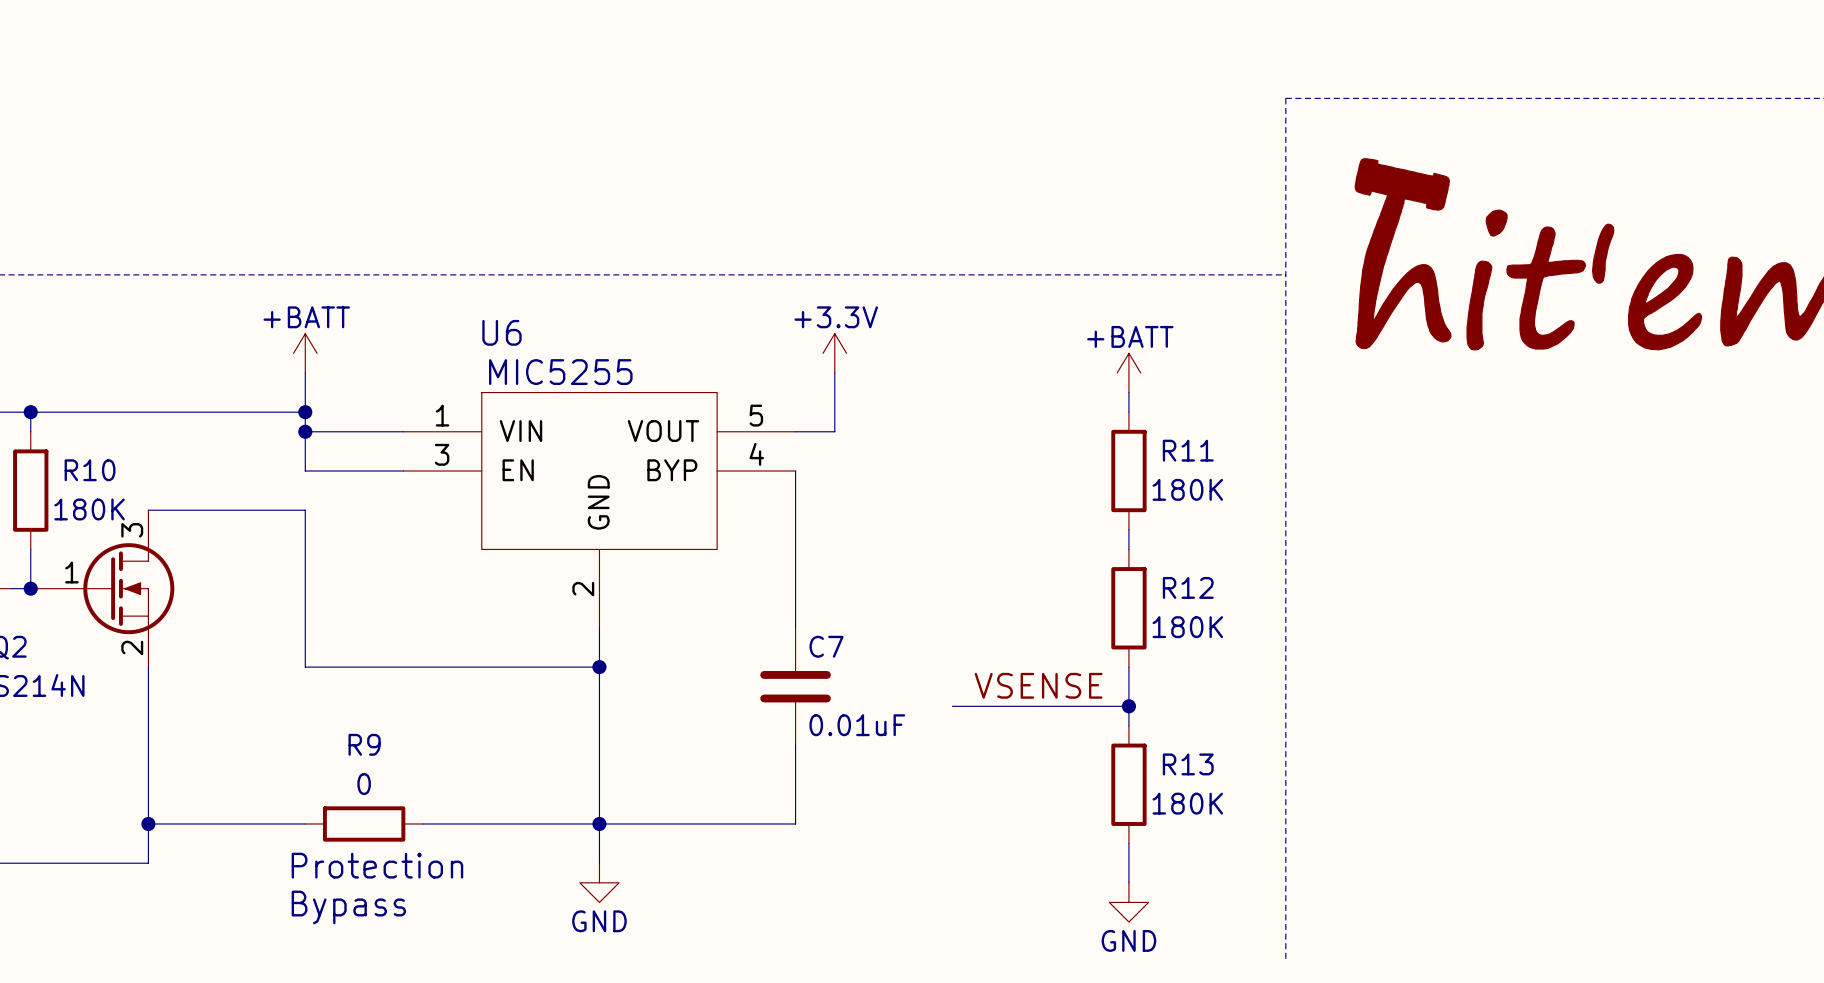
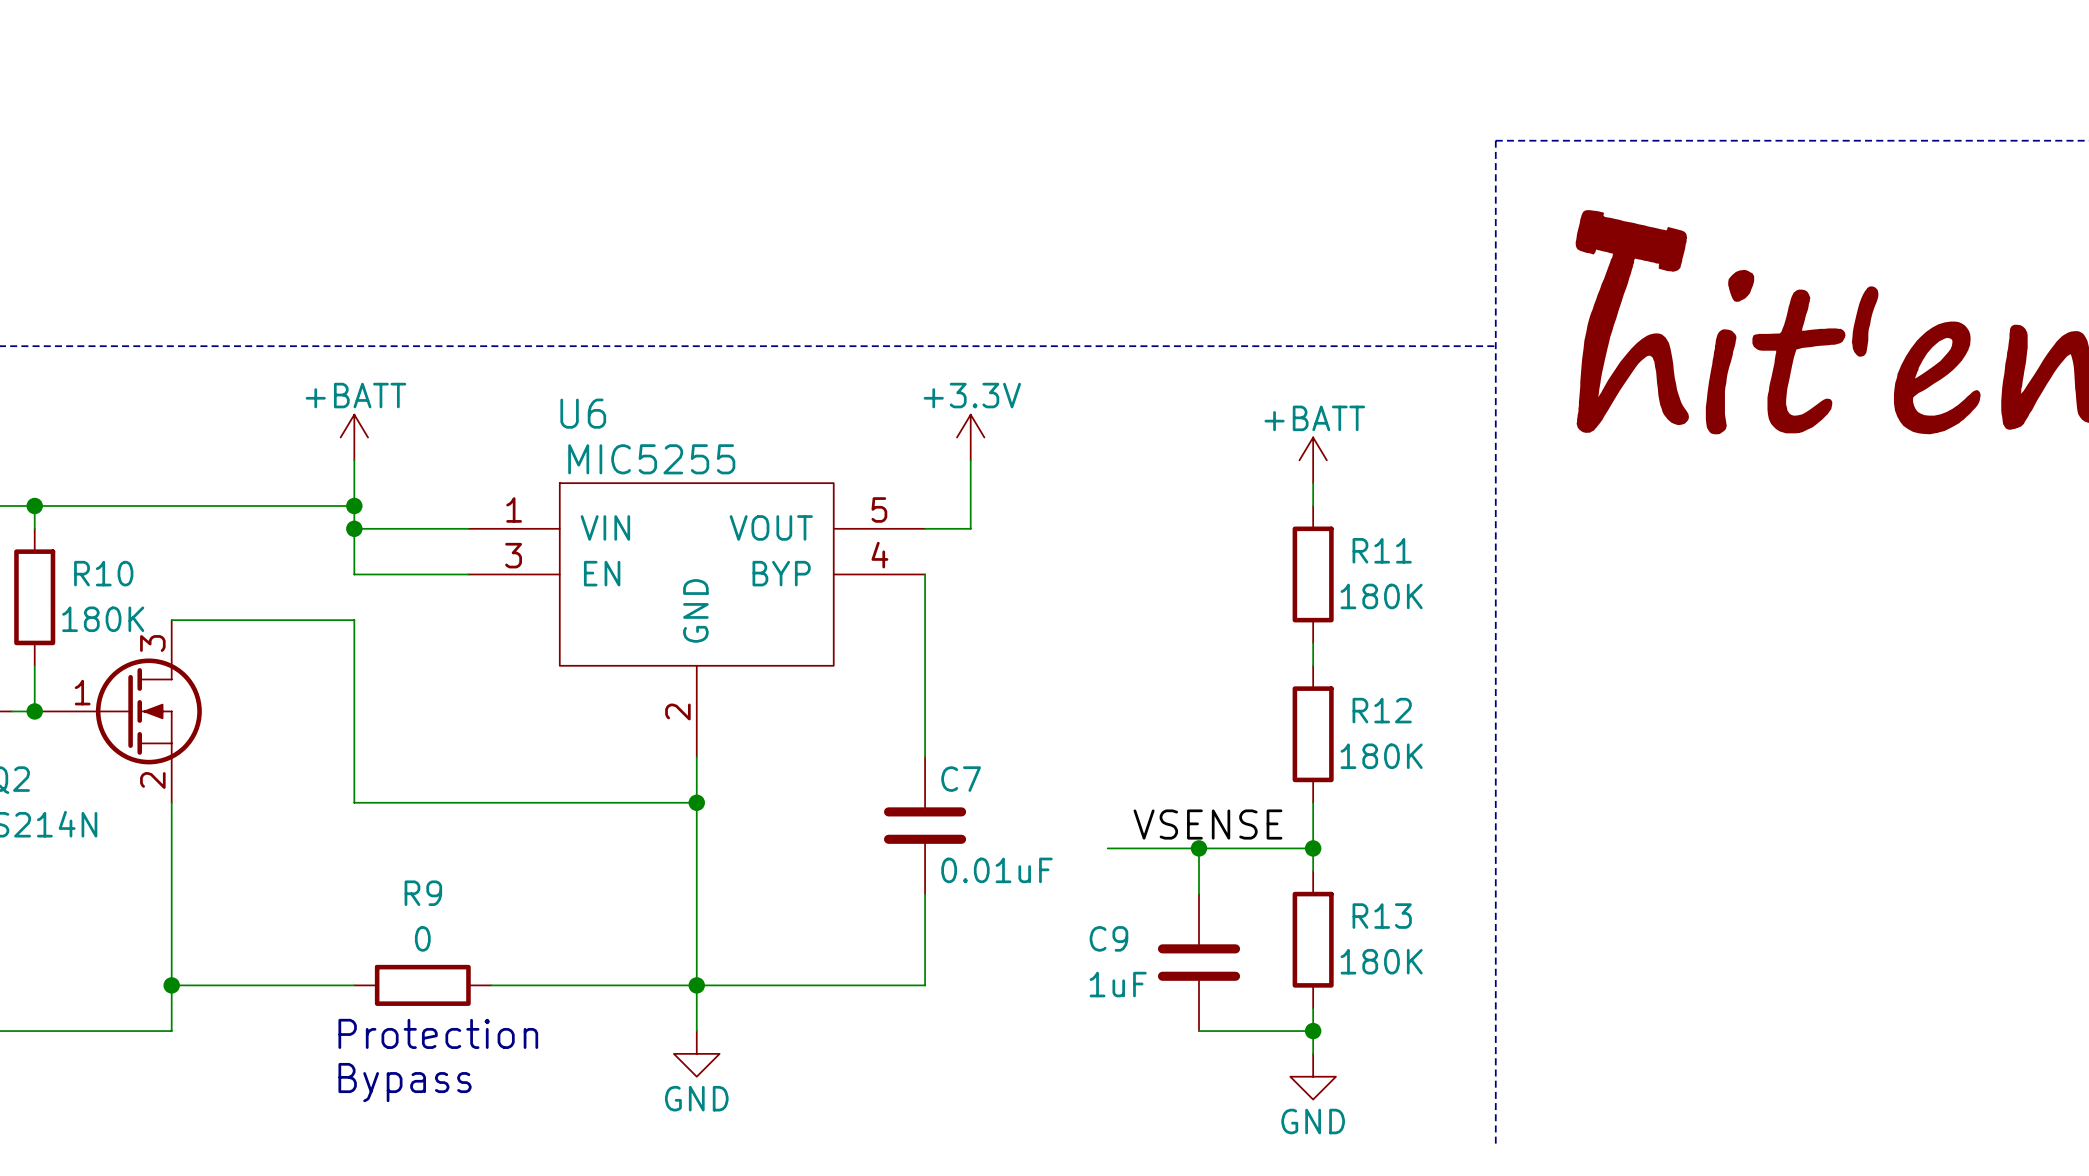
wire: none -> (1199, 848) (1199, 894)
junction: none -> (1199, 848)
C9: none -> 1uF (1199, 962)
wire: none -> (1199, 1031) (1313, 1031)
junction: none -> (1313, 1031)

